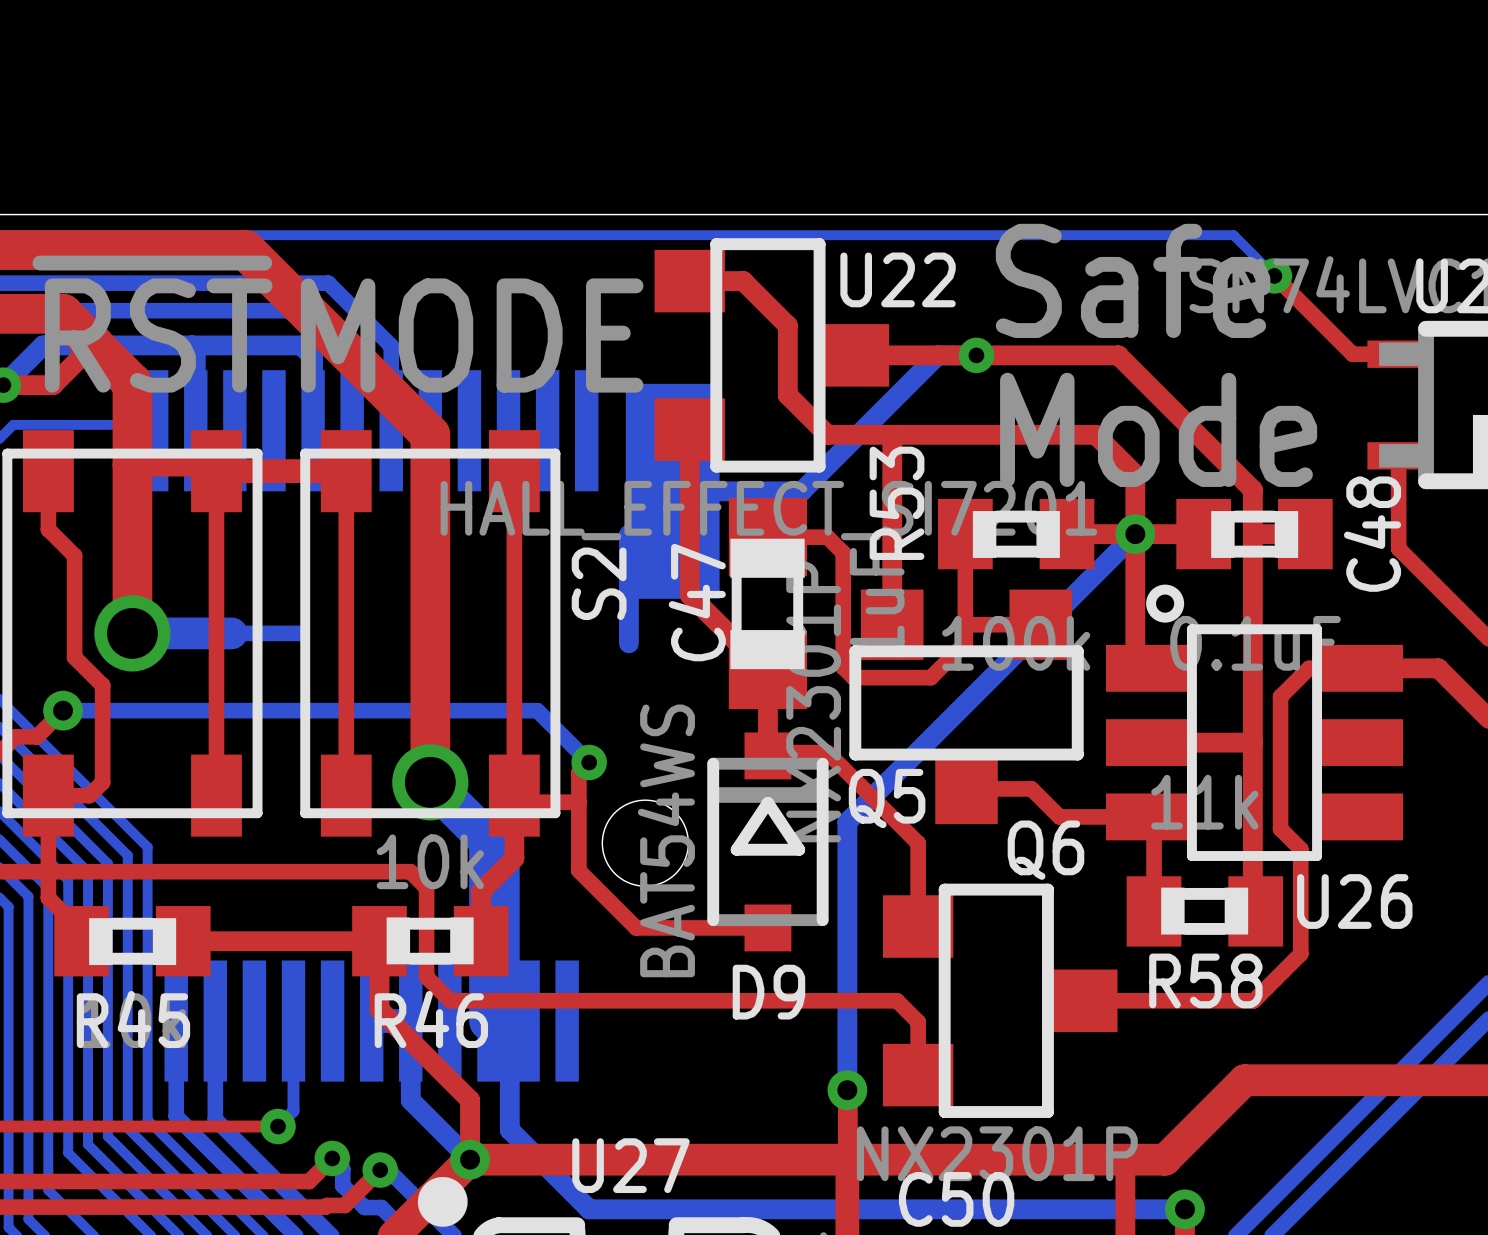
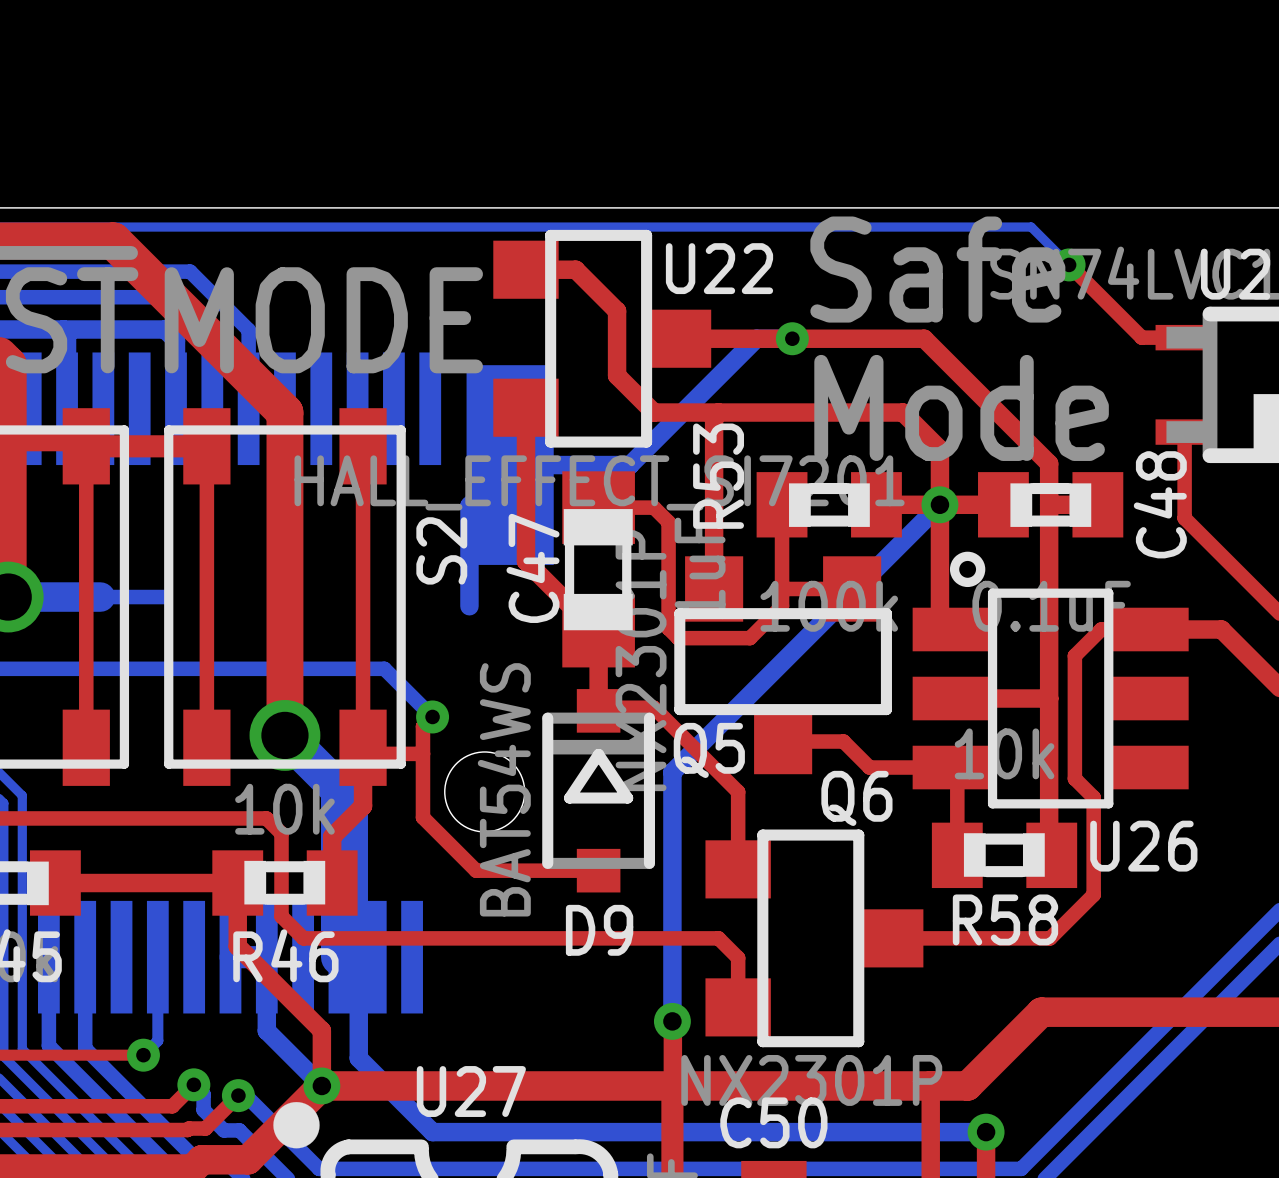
R58 value: 11k (1204, 802) -> 10k (1004, 753)

